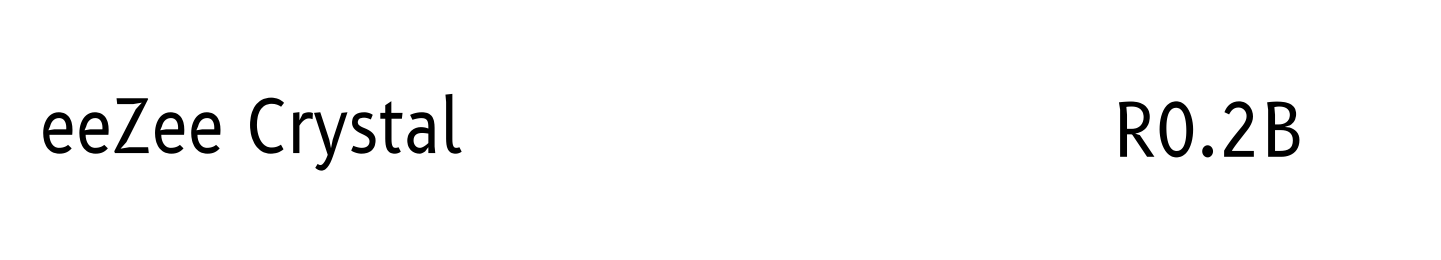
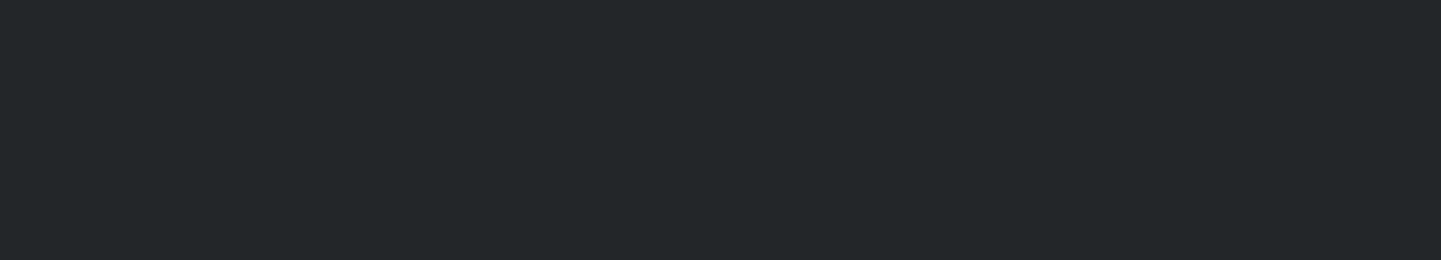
text: R0.2B (1209, 129) -> none
text: eeZee Crystal (252, 132) -> none

